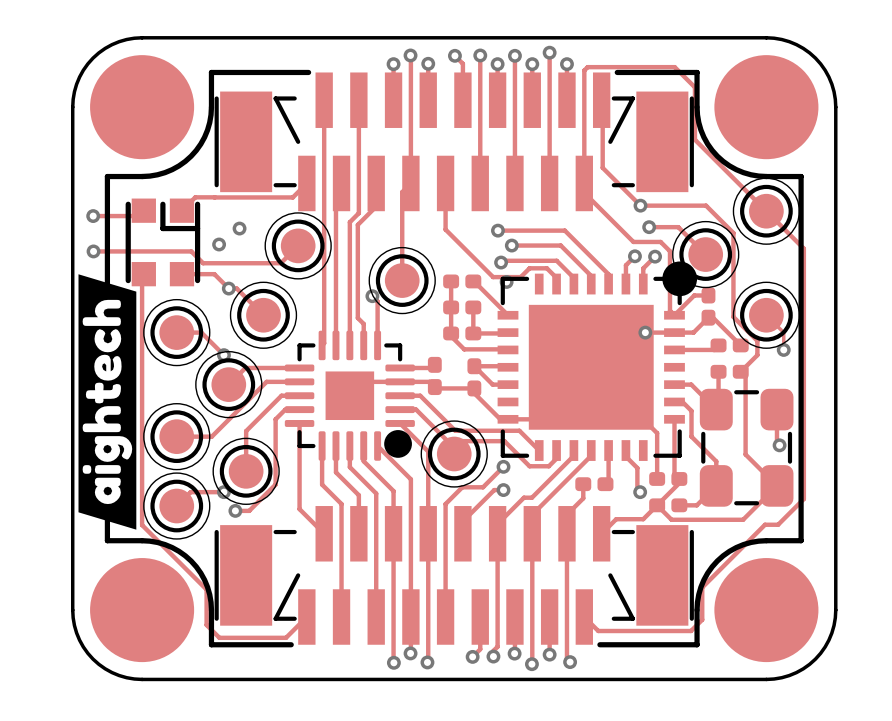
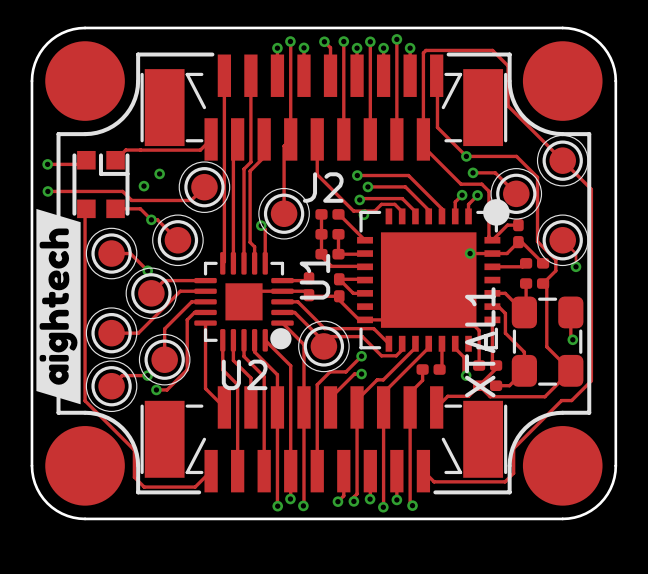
J2 name: none -> J2 (323, 187)
U1 name: none -> U1 (314, 276)
XTAL1 name: none -> XTAL1 (480, 342)
U2 name: none -> U2 (244, 374)

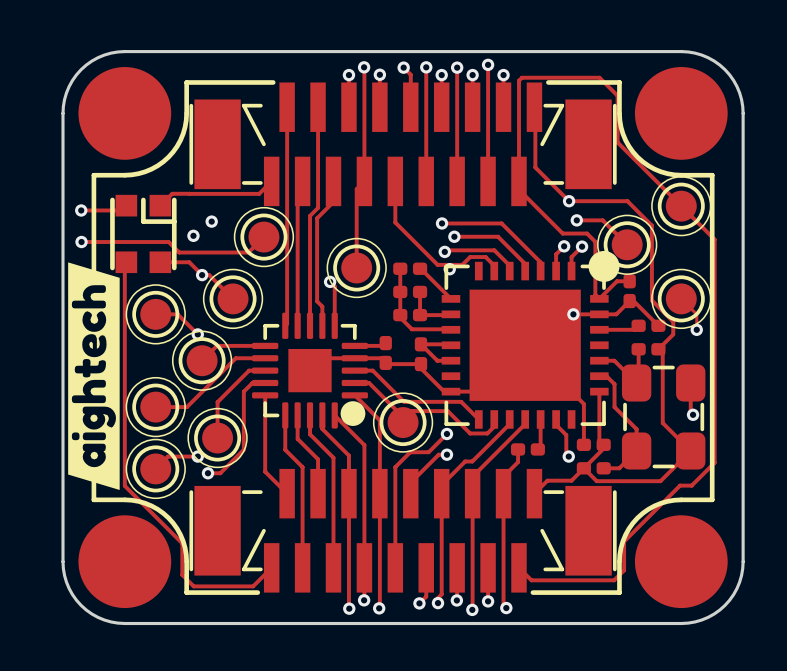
J2 name: J2 (323, 187) -> none
U1 name: U1 (314, 276) -> none
XTAL1 name: XTAL1 (480, 342) -> none
U2 name: U2 (244, 374) -> none

